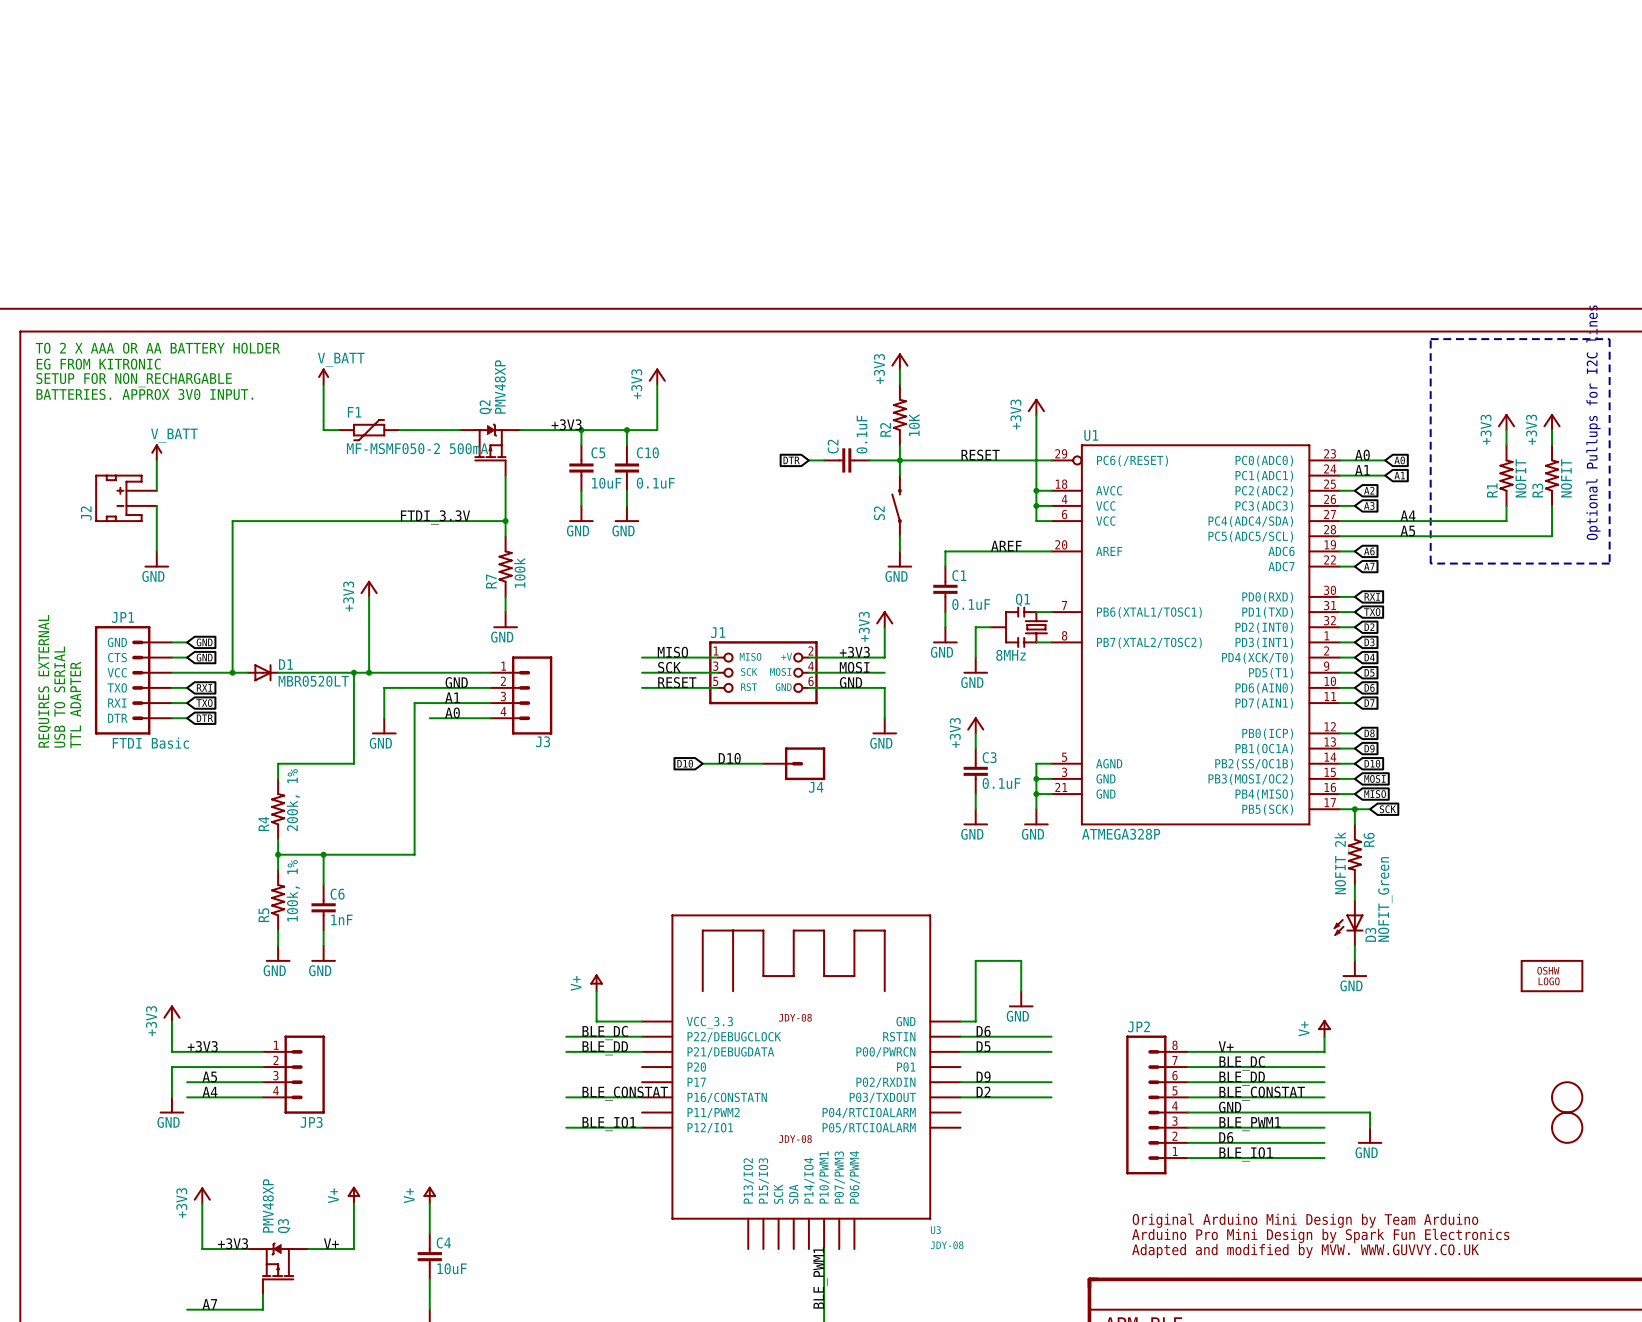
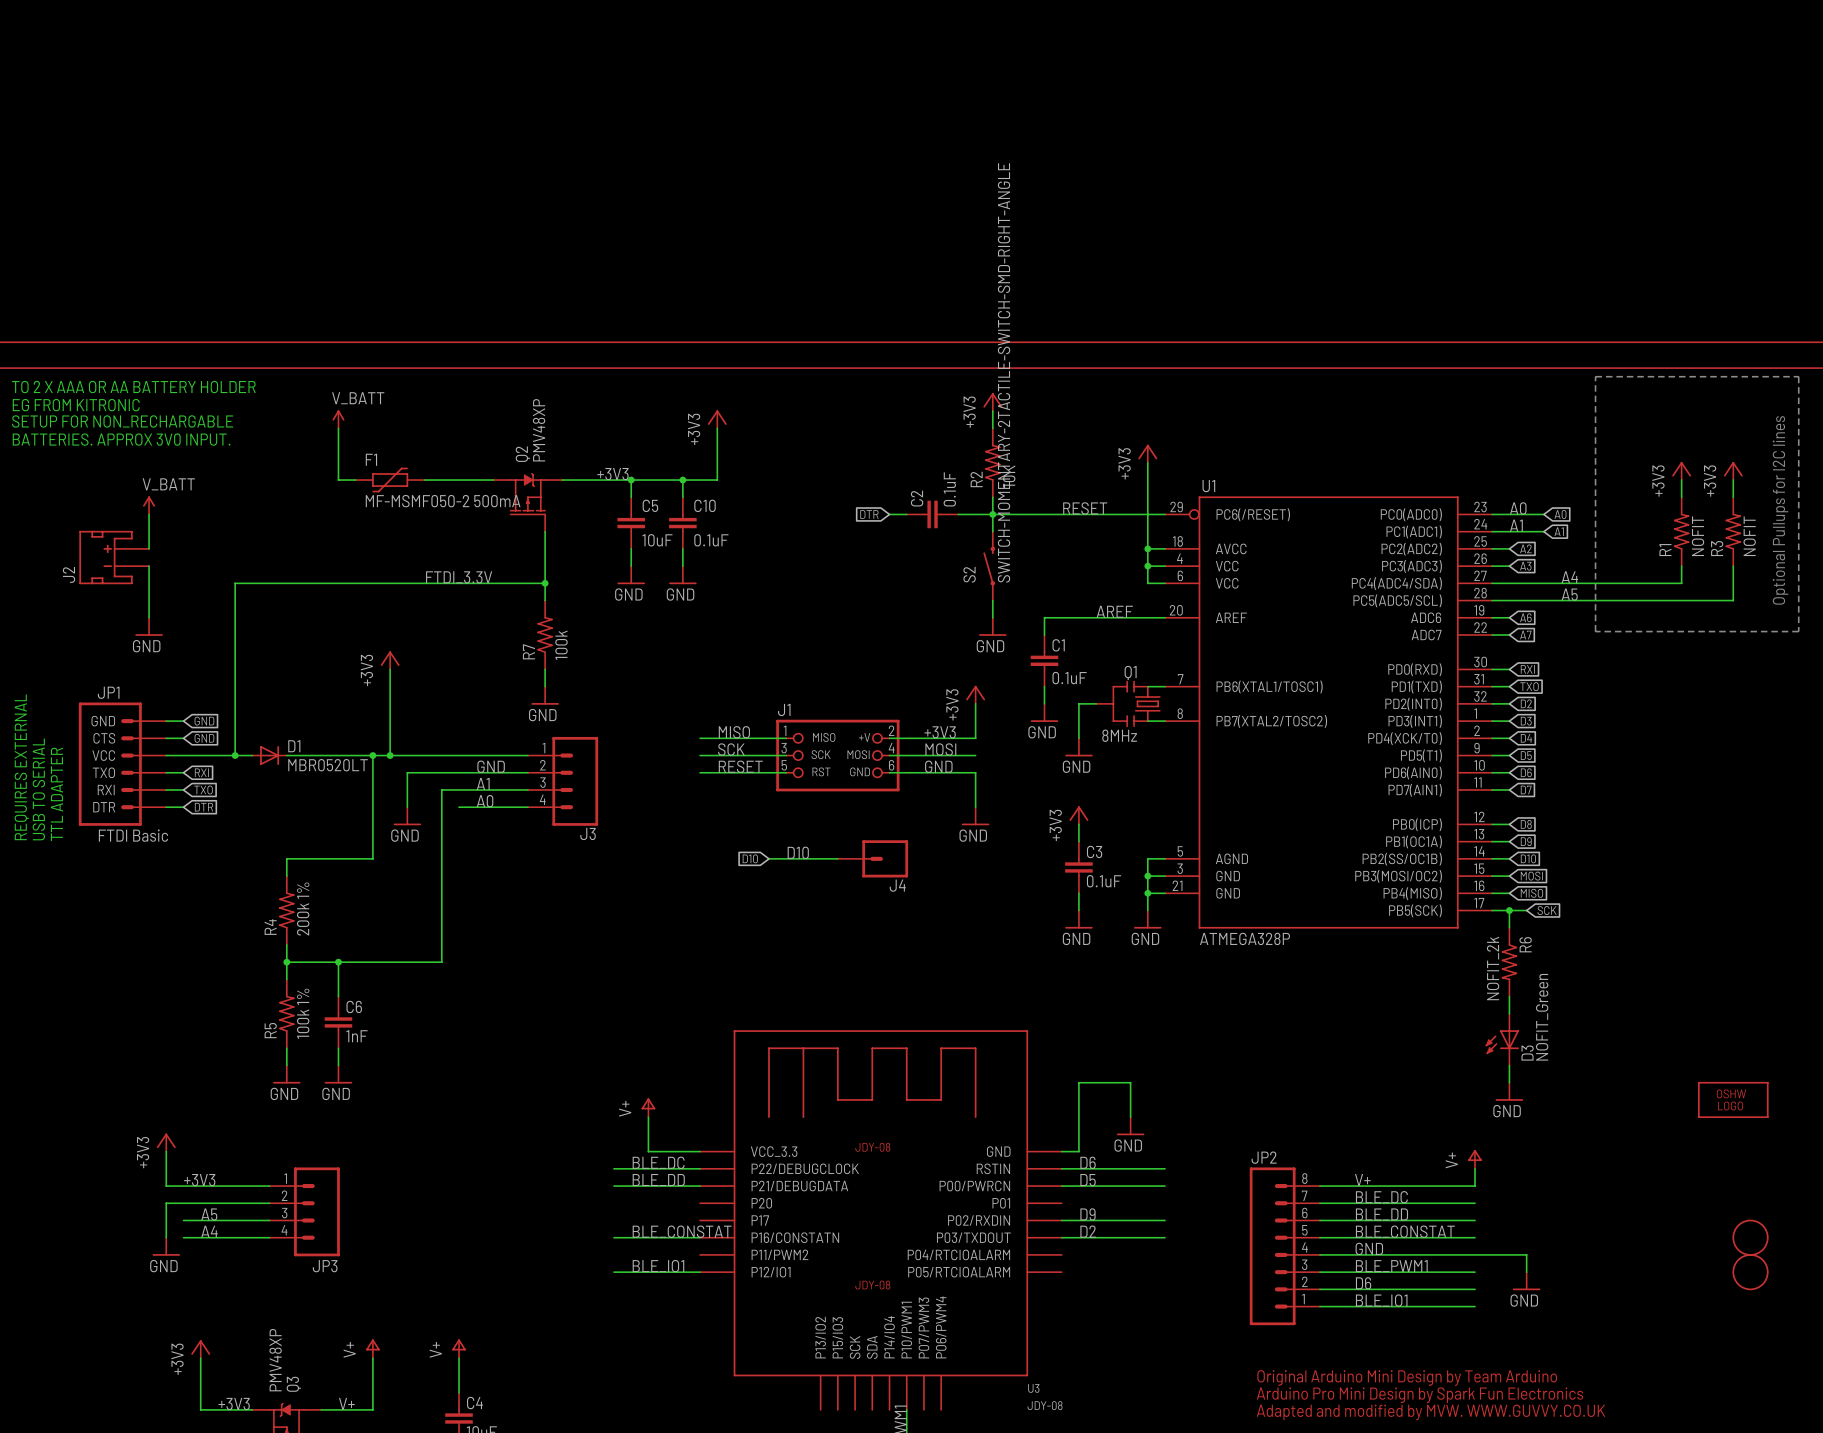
S2 value: none -> SWITCH-MOMENTARY-2TACTILE-SWITCH-SMD-RIGHT-ANGLE (1004, 372)
R4 value: 200k, 1% (293, 800) -> 200k 1% (303, 909)
R5 value: 100k, 1% (293, 890) -> 100k 1% (303, 1013)

